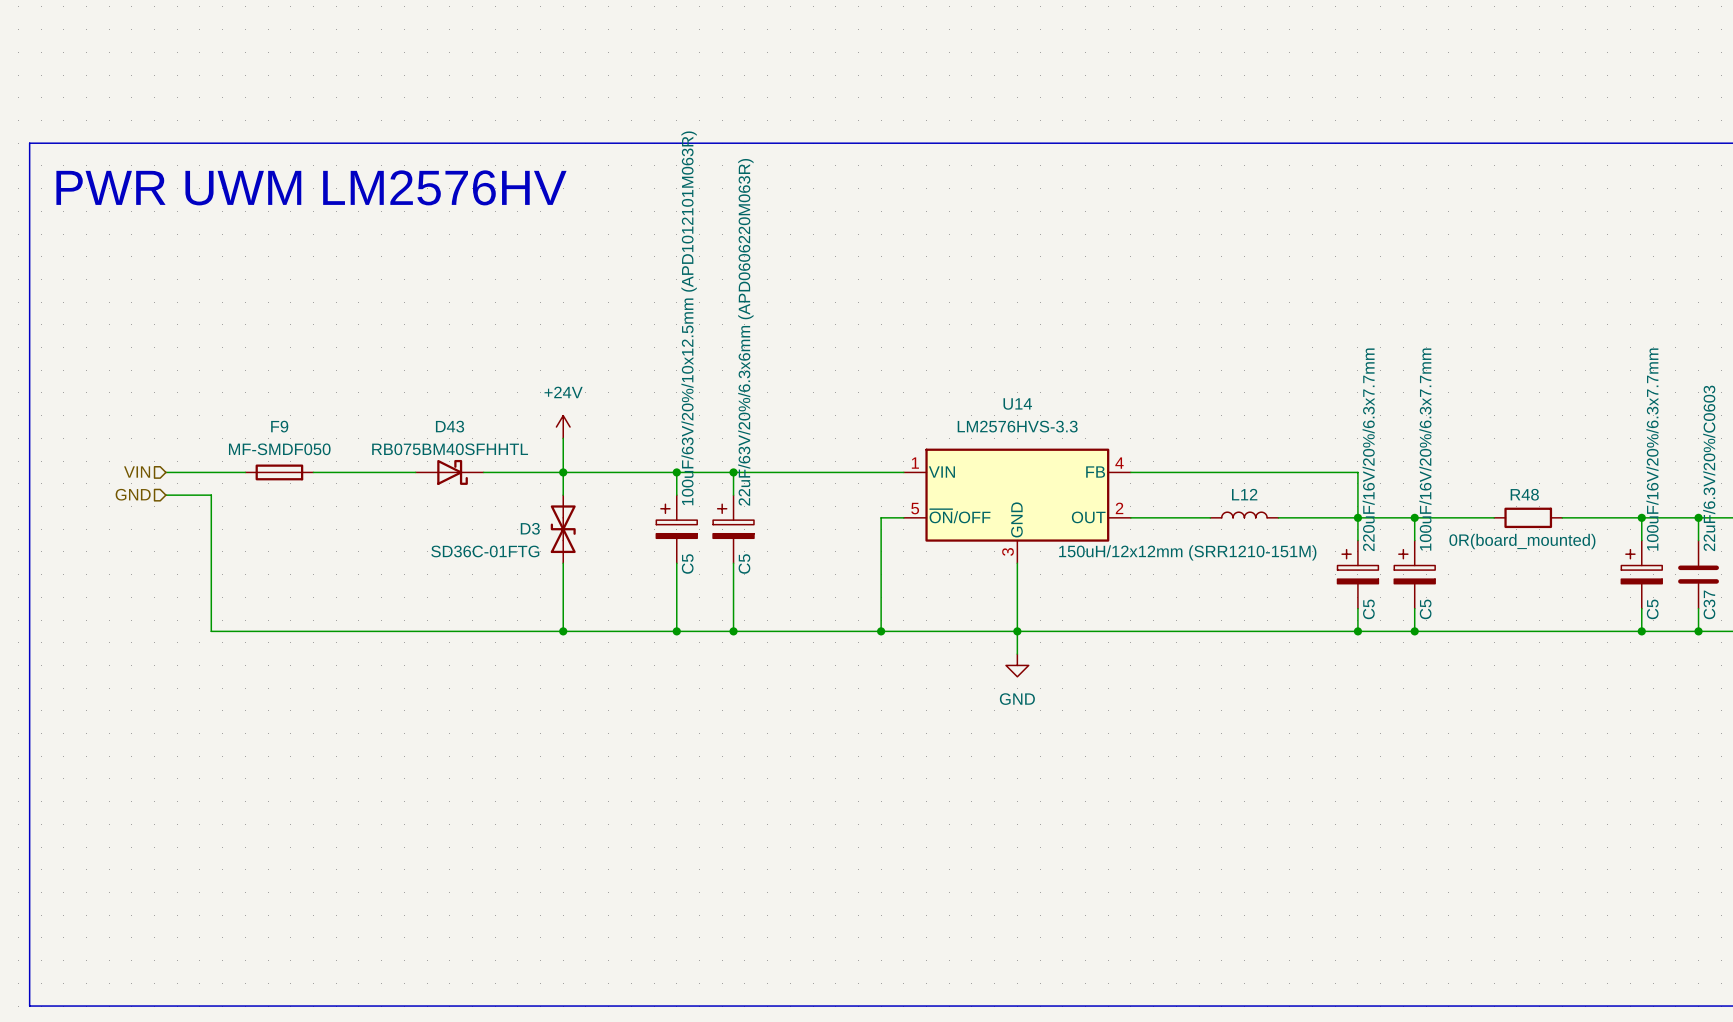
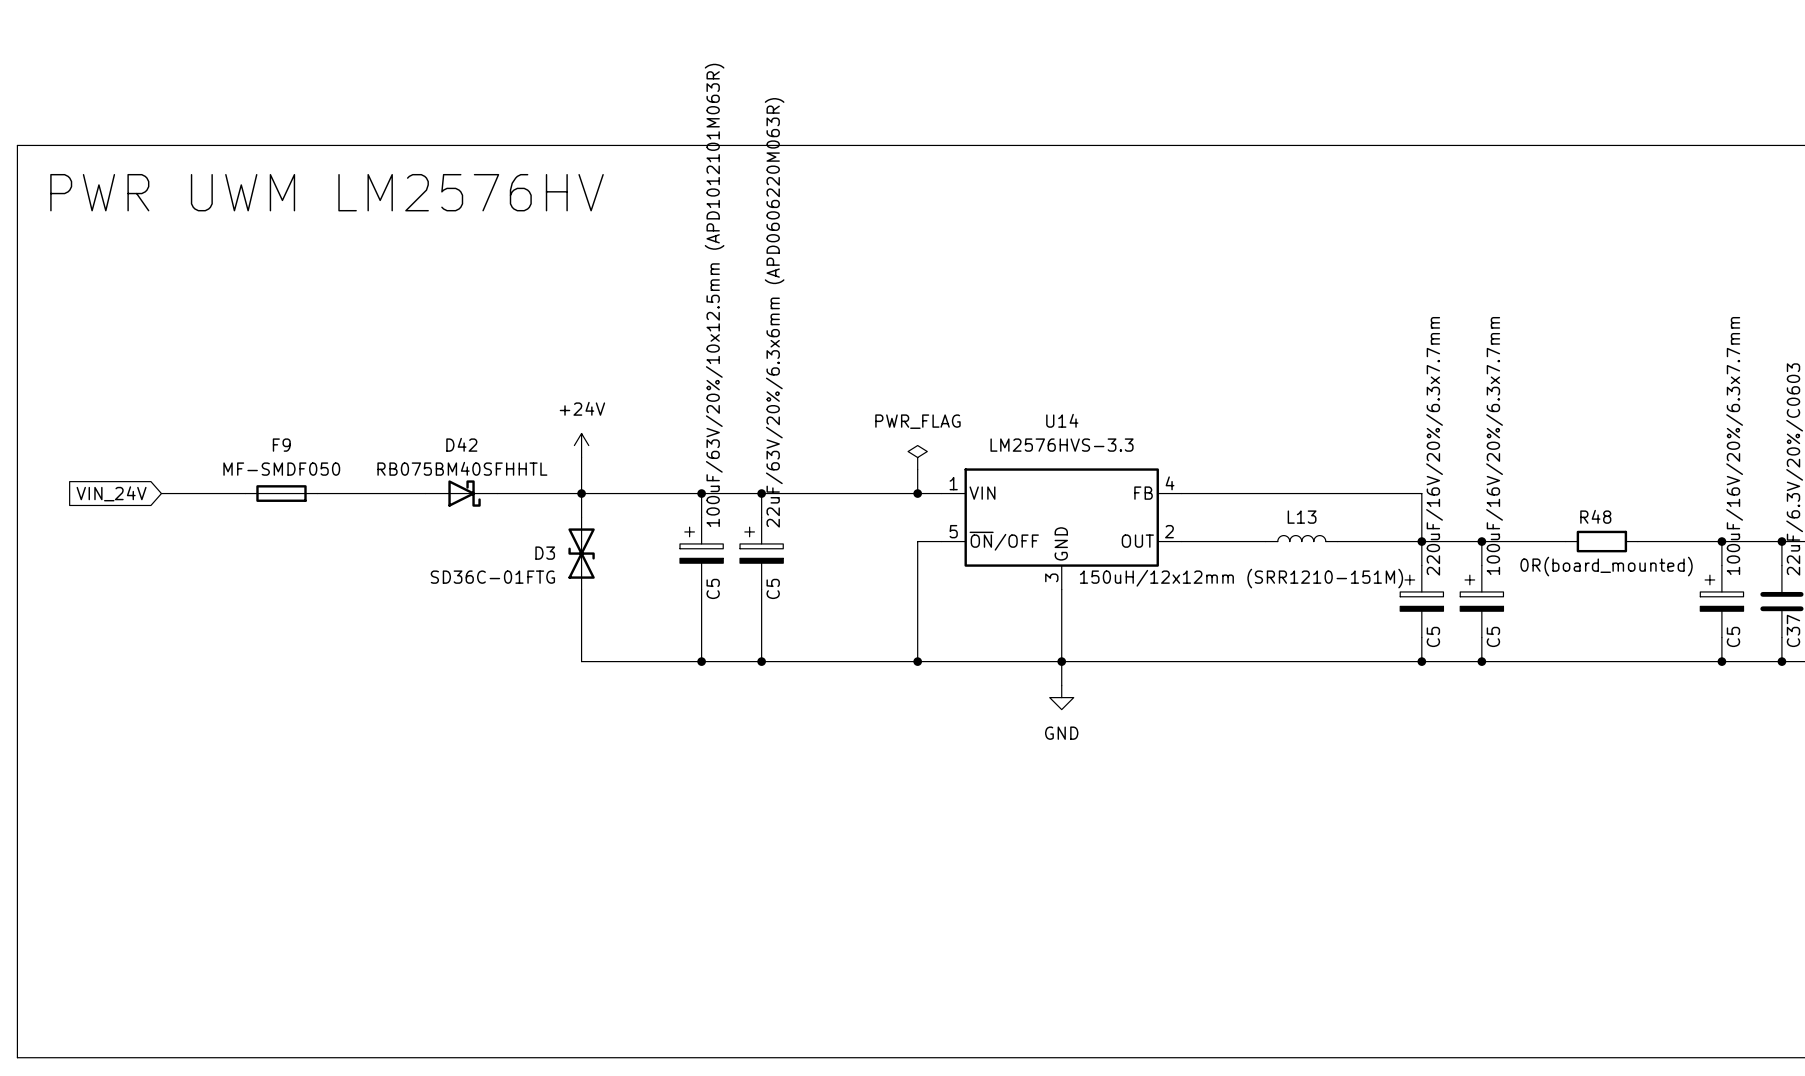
D43 name: D43 (450, 426) -> D42 (461, 444)
power symbol: none -> PWR_FLAG (917, 457)
wire: none -> (917, 469) (917, 493)
hierarchical label: VIN (137, 472) -> none
junction: none -> (917, 493)
global label: none -> VIN_24V (111, 493)
hierarchical label: GND (133, 494) -> none
L12 name: L12 (1244, 494) -> L13 (1302, 517)
wire: (165, 495) (211, 495) (211, 631) (563, 631) -> none
junction: (563, 631) -> none

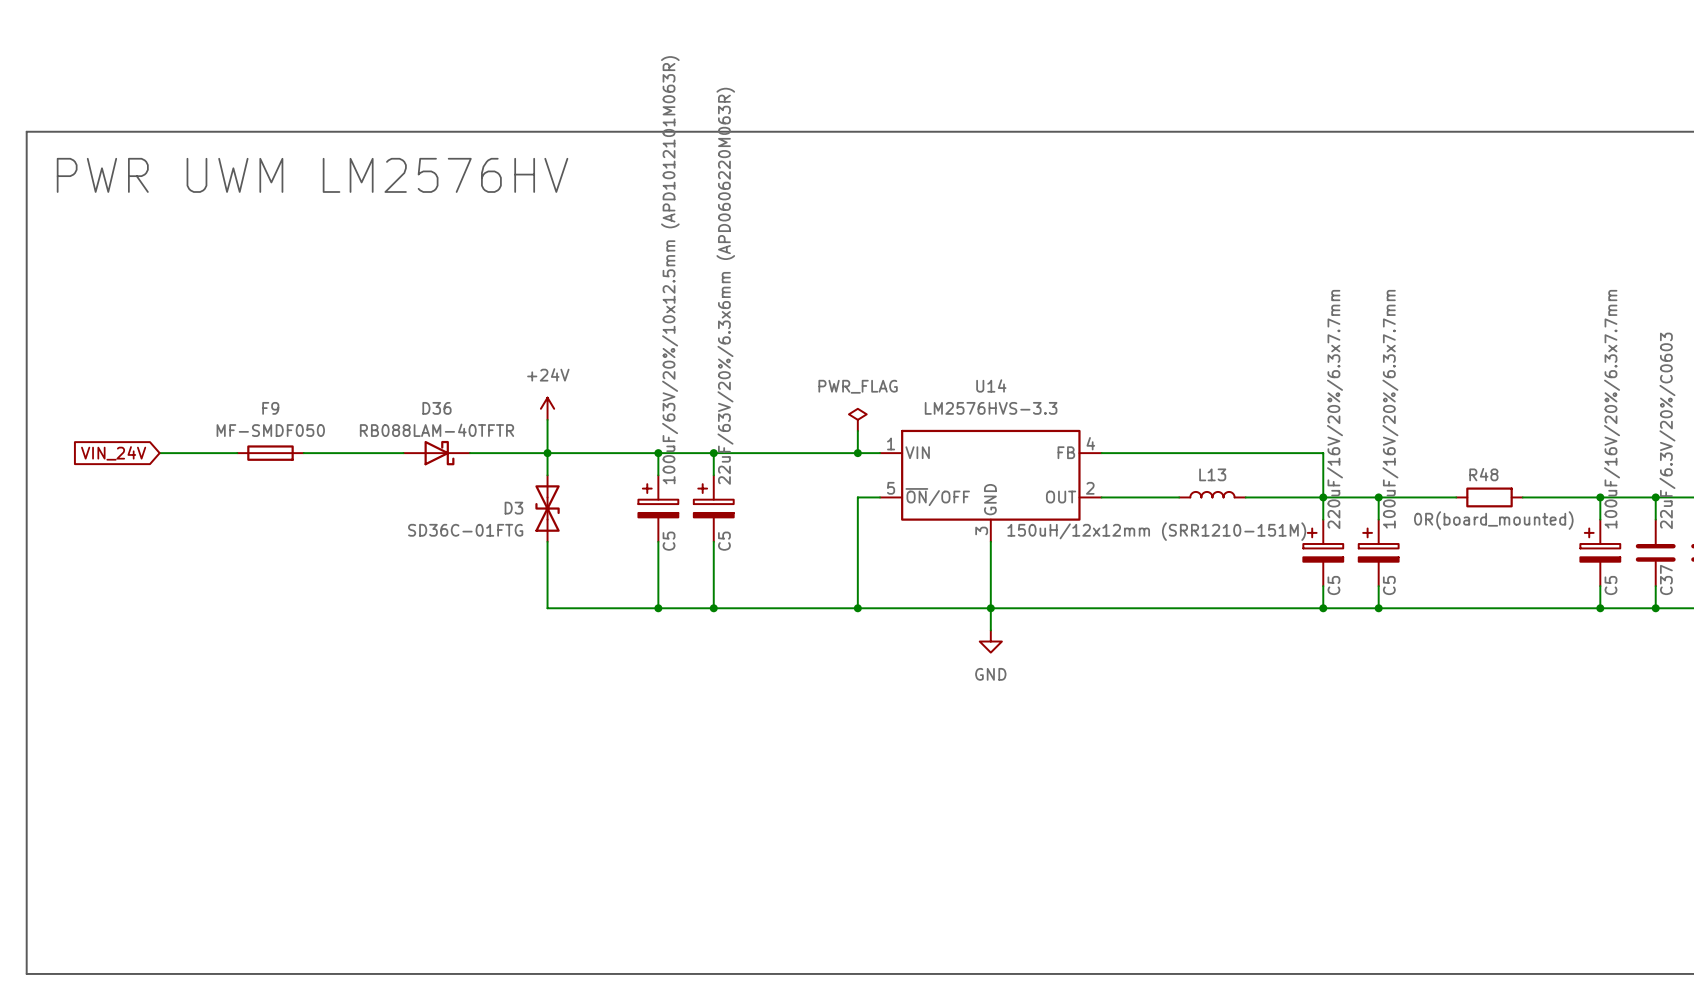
D42 name: D42 (461, 444) -> D36 (436, 408)
D42 value: RB075BM40SFHHTL (462, 468) -> RB088LAM-40TFTR (436, 430)

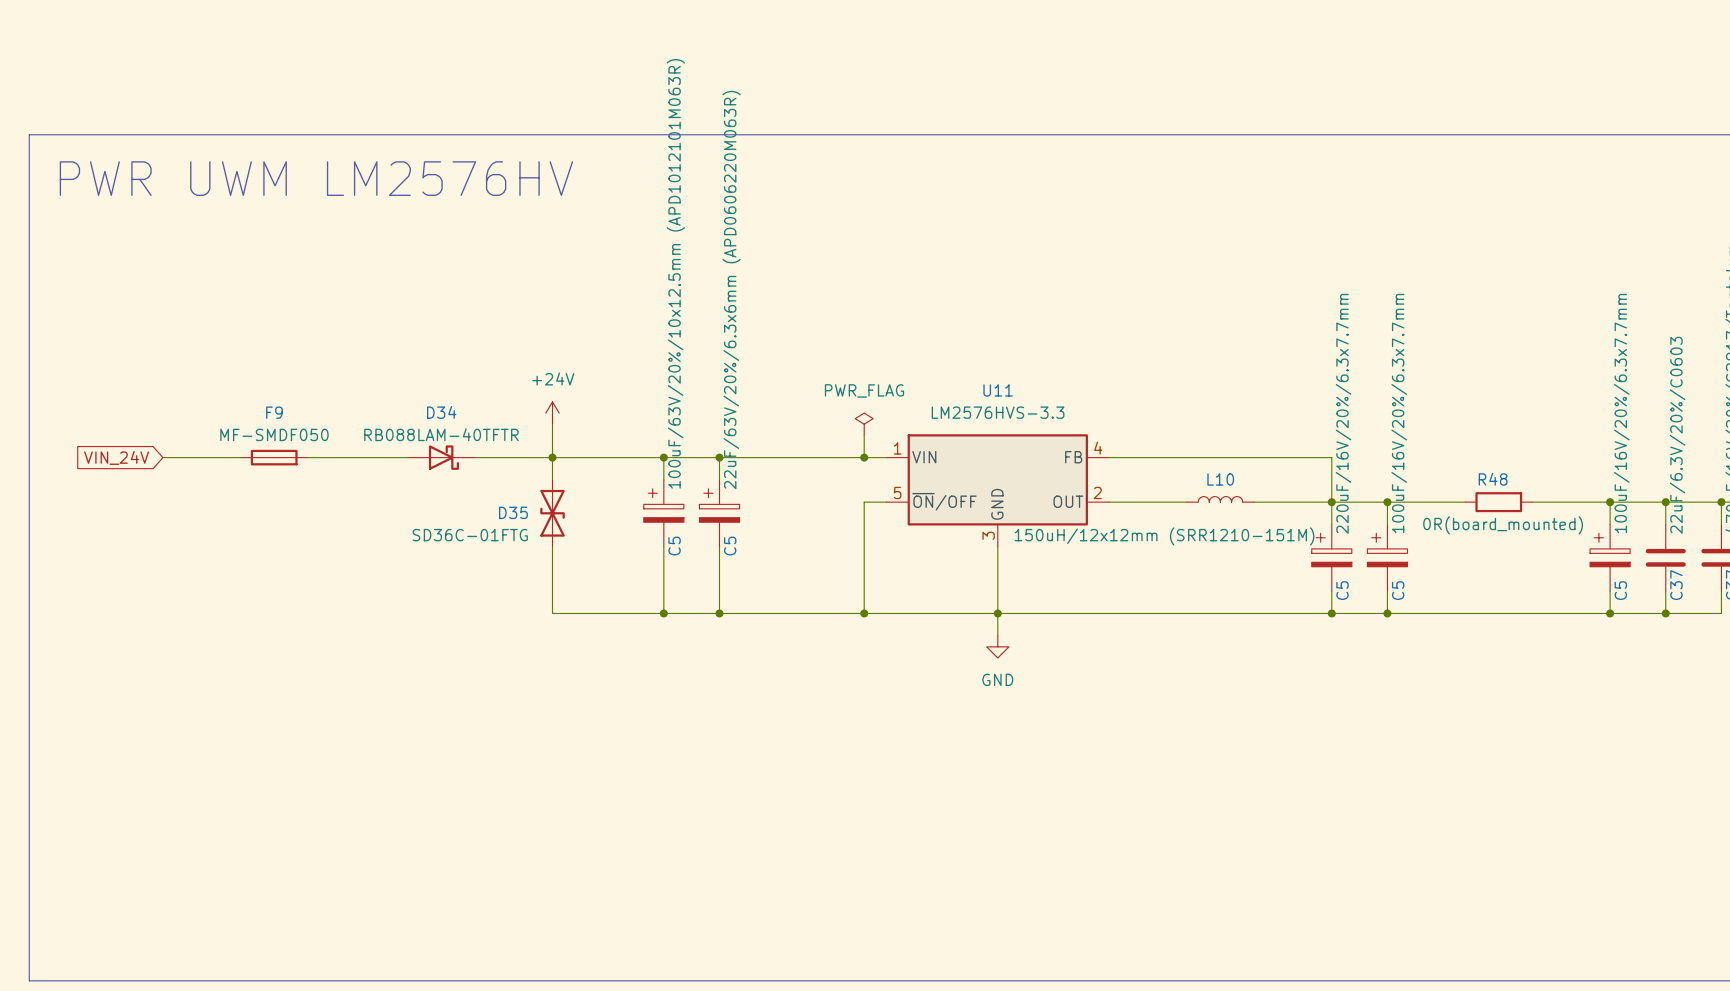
U14 name: U14 (991, 385) -> U11 (998, 390)
D36 name: D36 (436, 408) -> D34 (441, 412)
L13 name: L13 (1212, 474) -> L10 (1220, 479)
D3 name: D3 (513, 508) -> D35 (513, 512)

